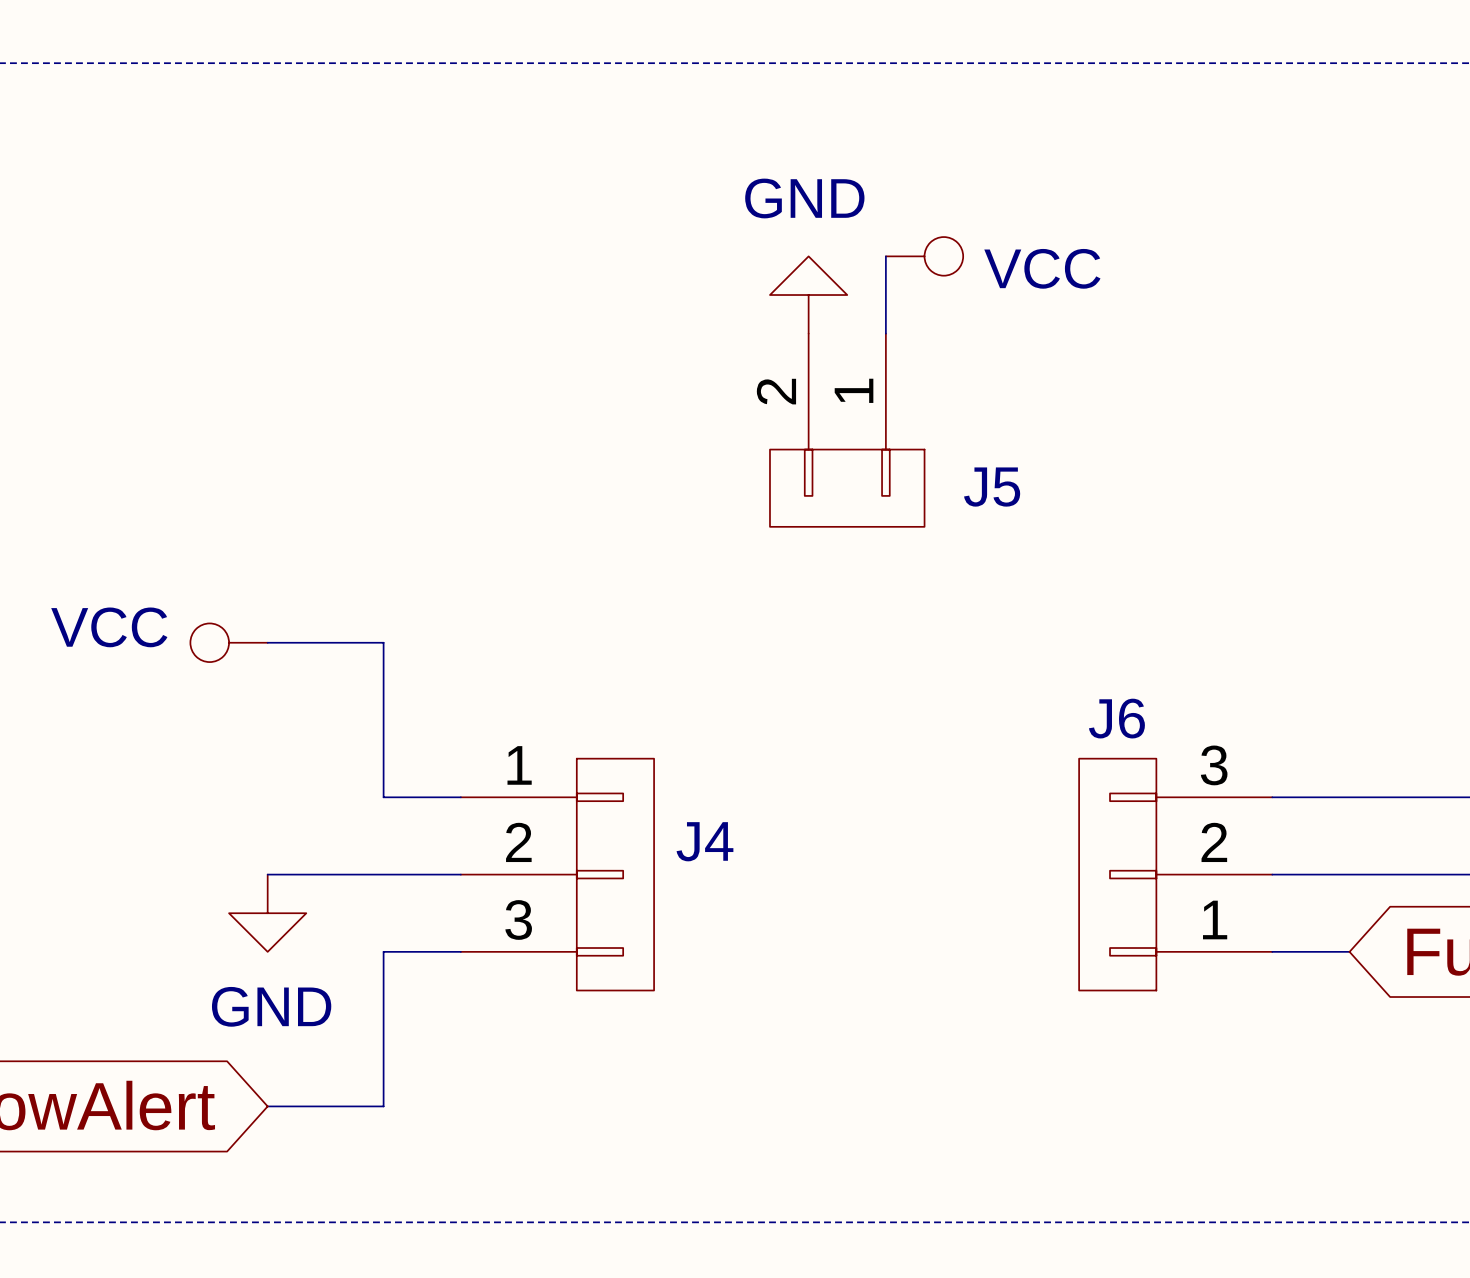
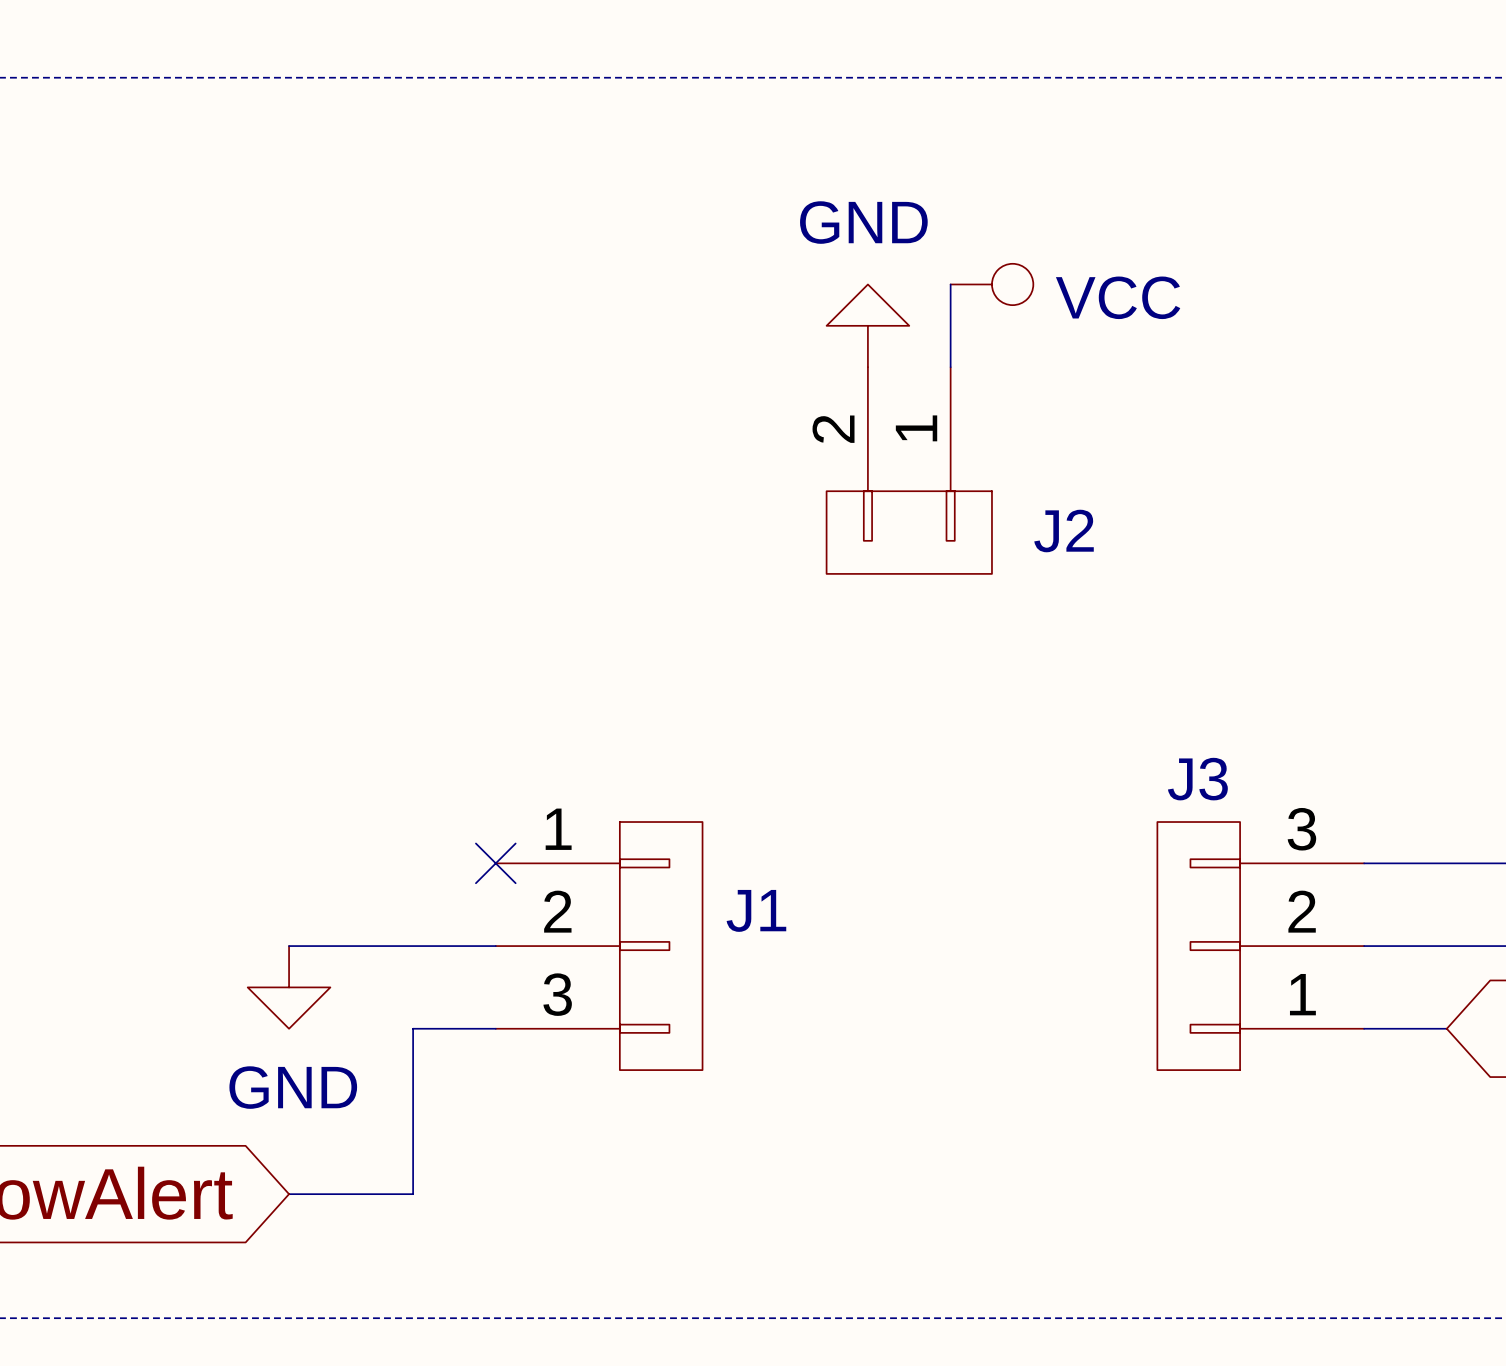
J5 name: J5 (992, 487) -> J2 (1064, 531)
power symbol: VCC (229, 642) -> none
wire: (267, 642) (383, 642) (383, 797) (460, 797) -> none
J6 name: J6 (1116, 718) -> J3 (1197, 779)
no-connect mark: none -> (495, 863)
J4 name: J4 (704, 841) -> J1 (756, 910)

